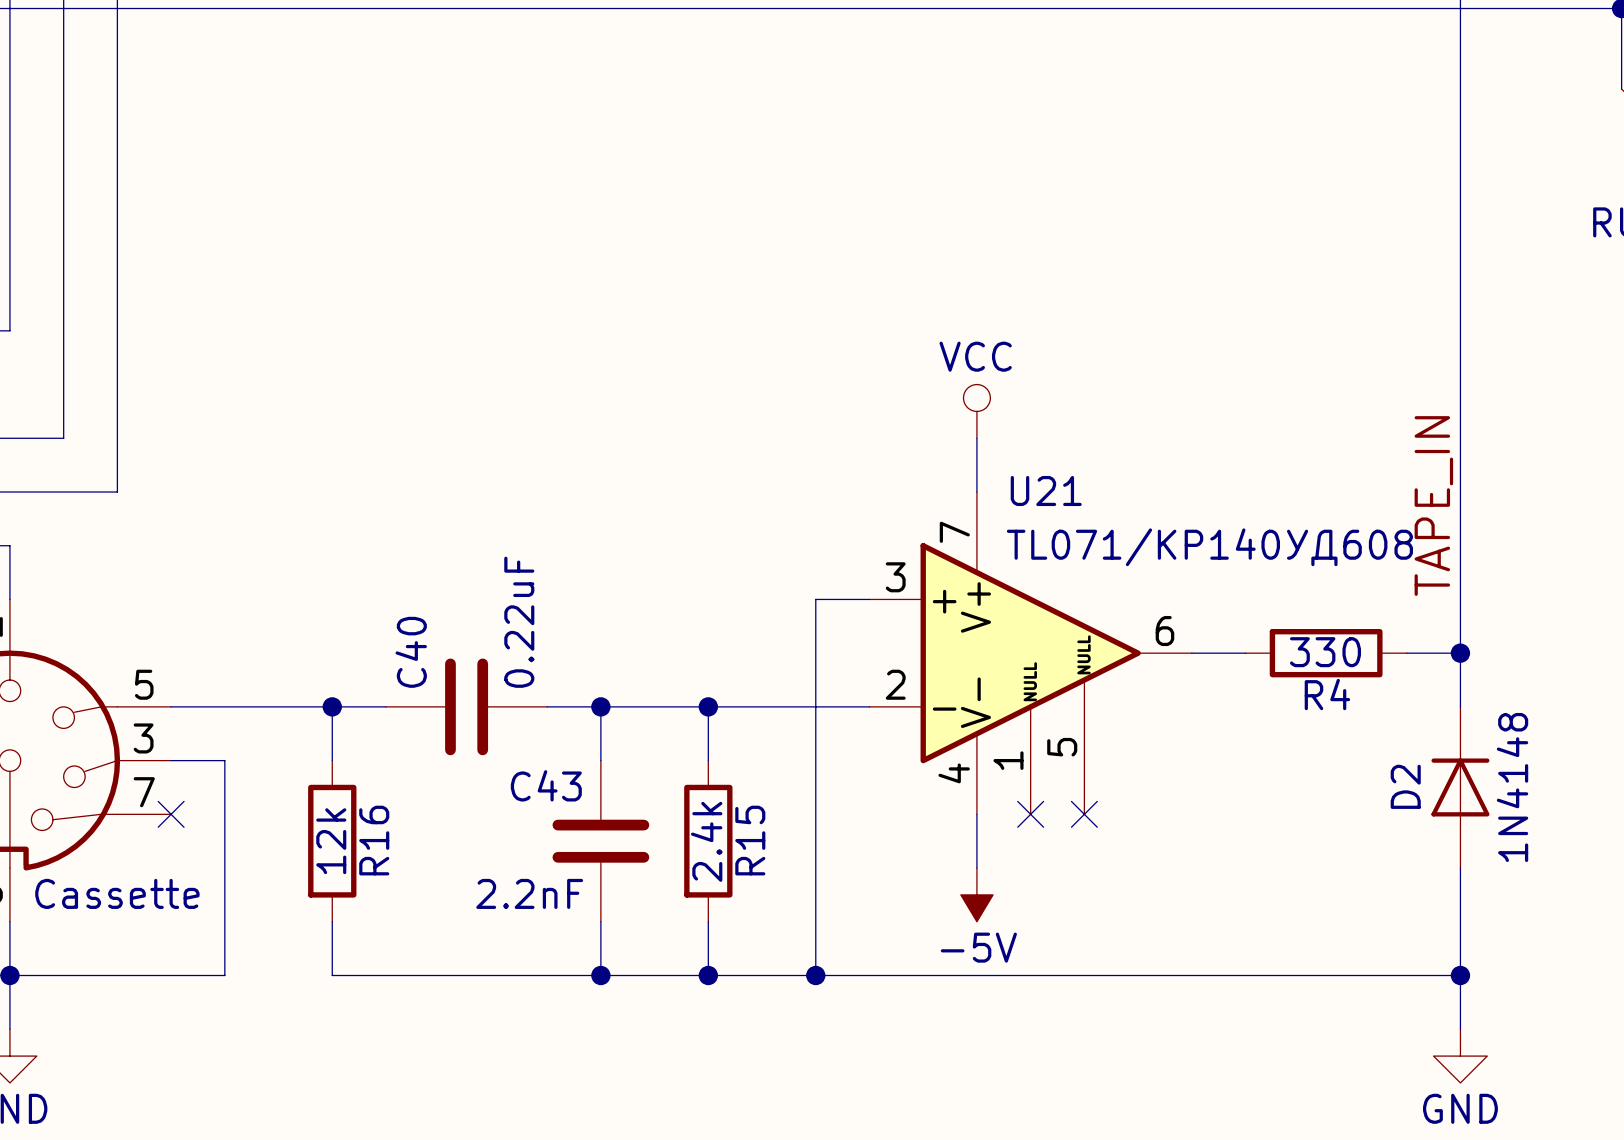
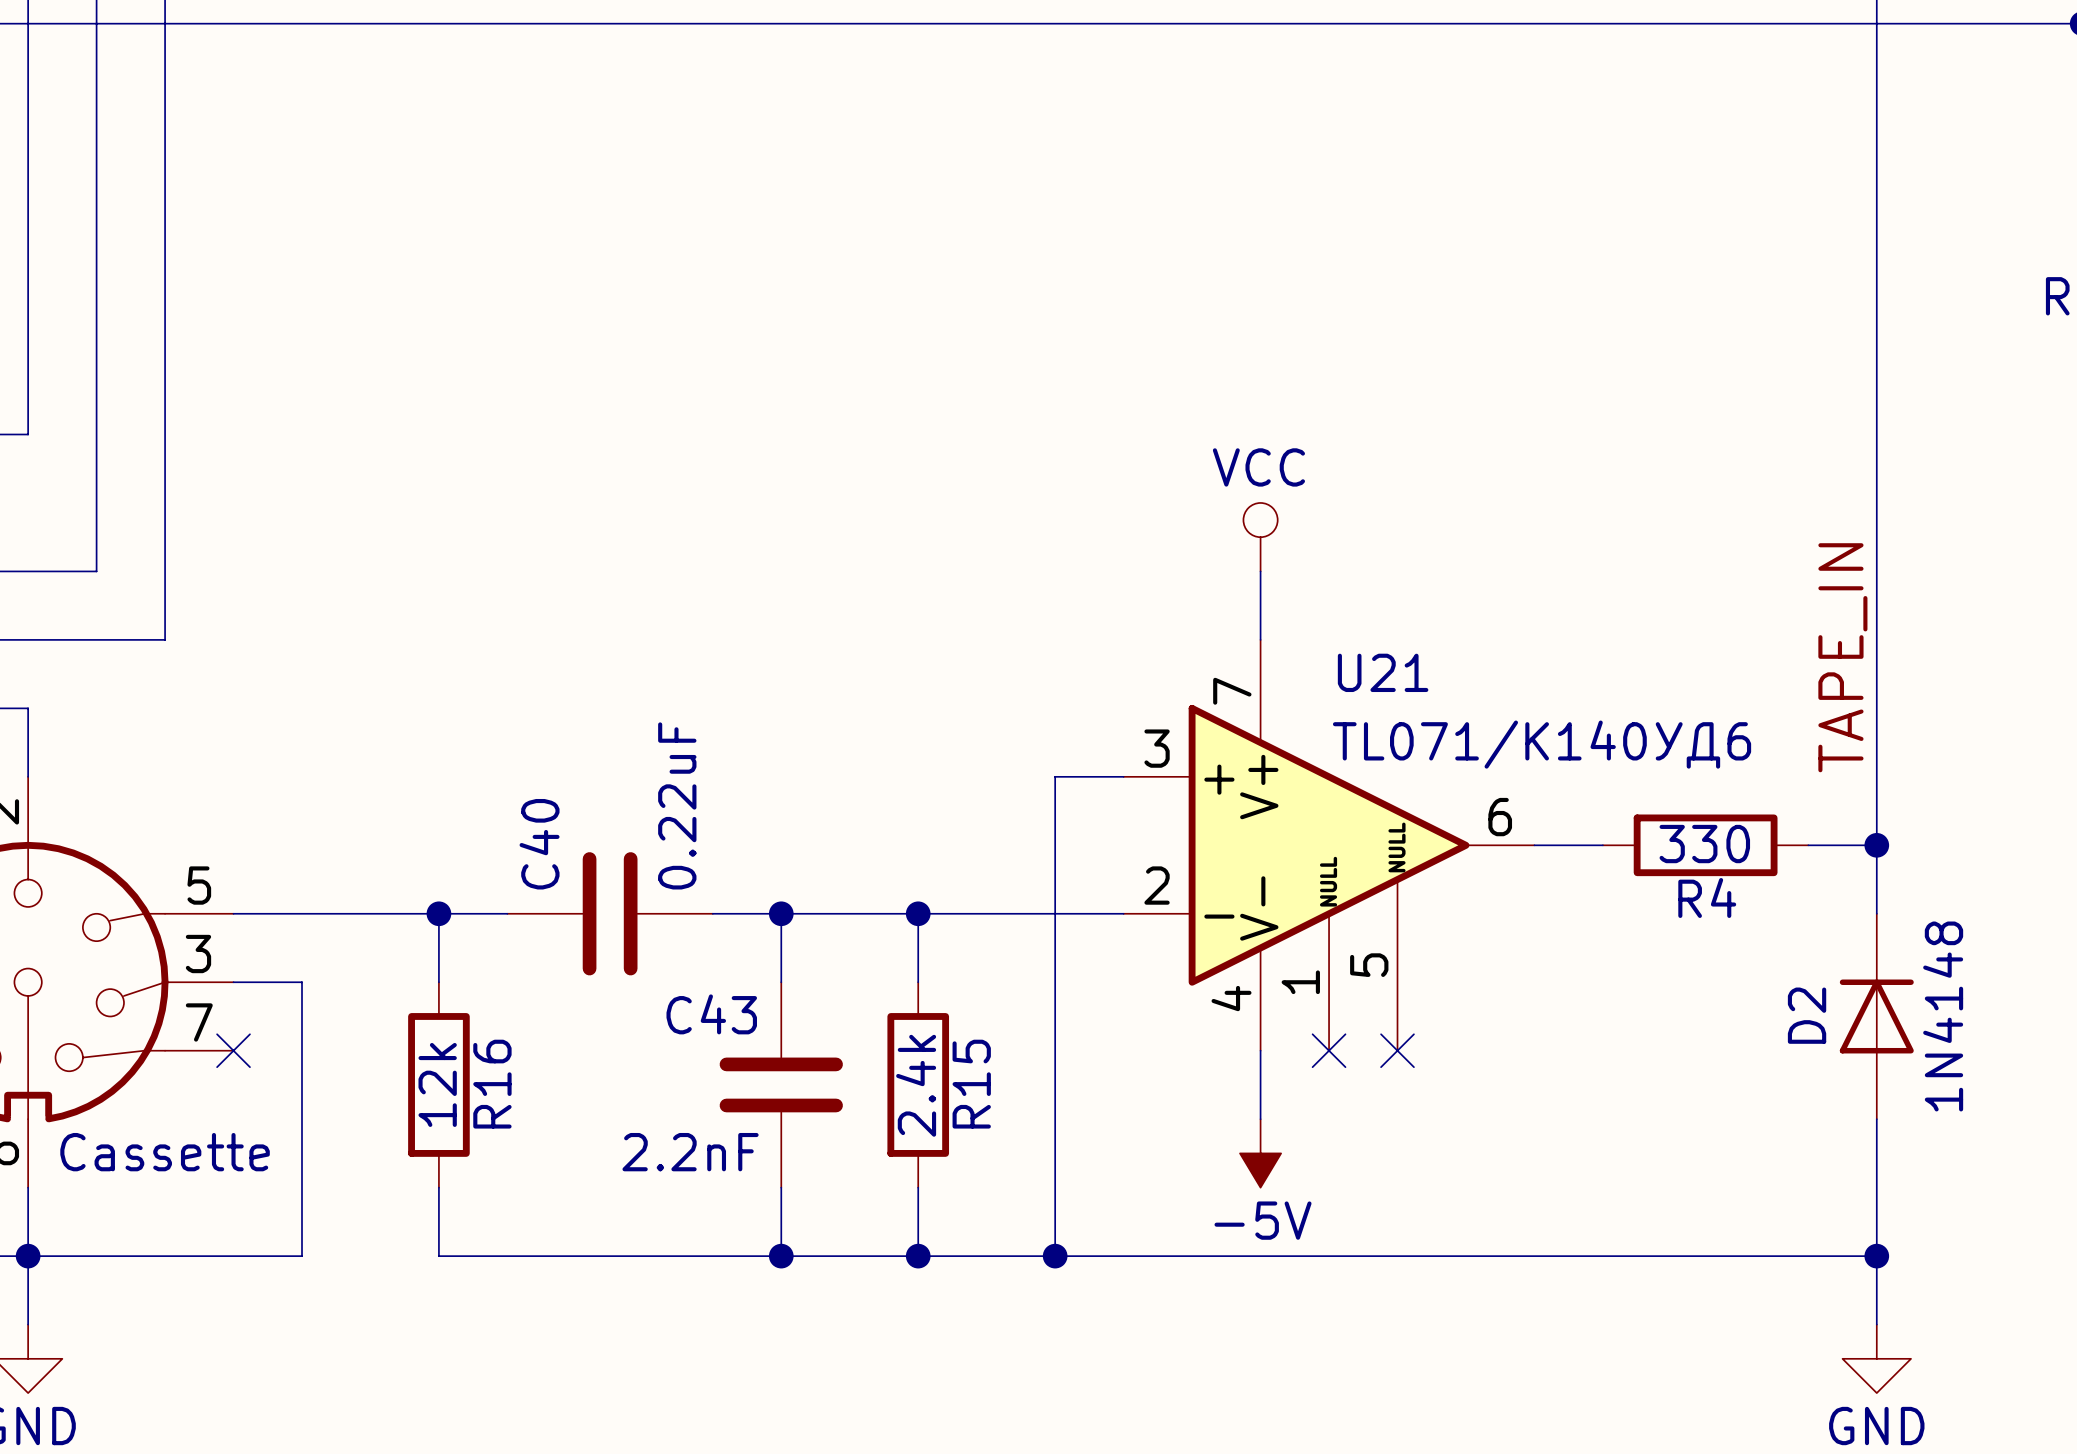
U21 name position: U21 (1046, 491) -> U21 (1383, 672)
U21 value: TL071/КР140УД608 (1209, 547) -> TL071/К140УД6 (1542, 744)

